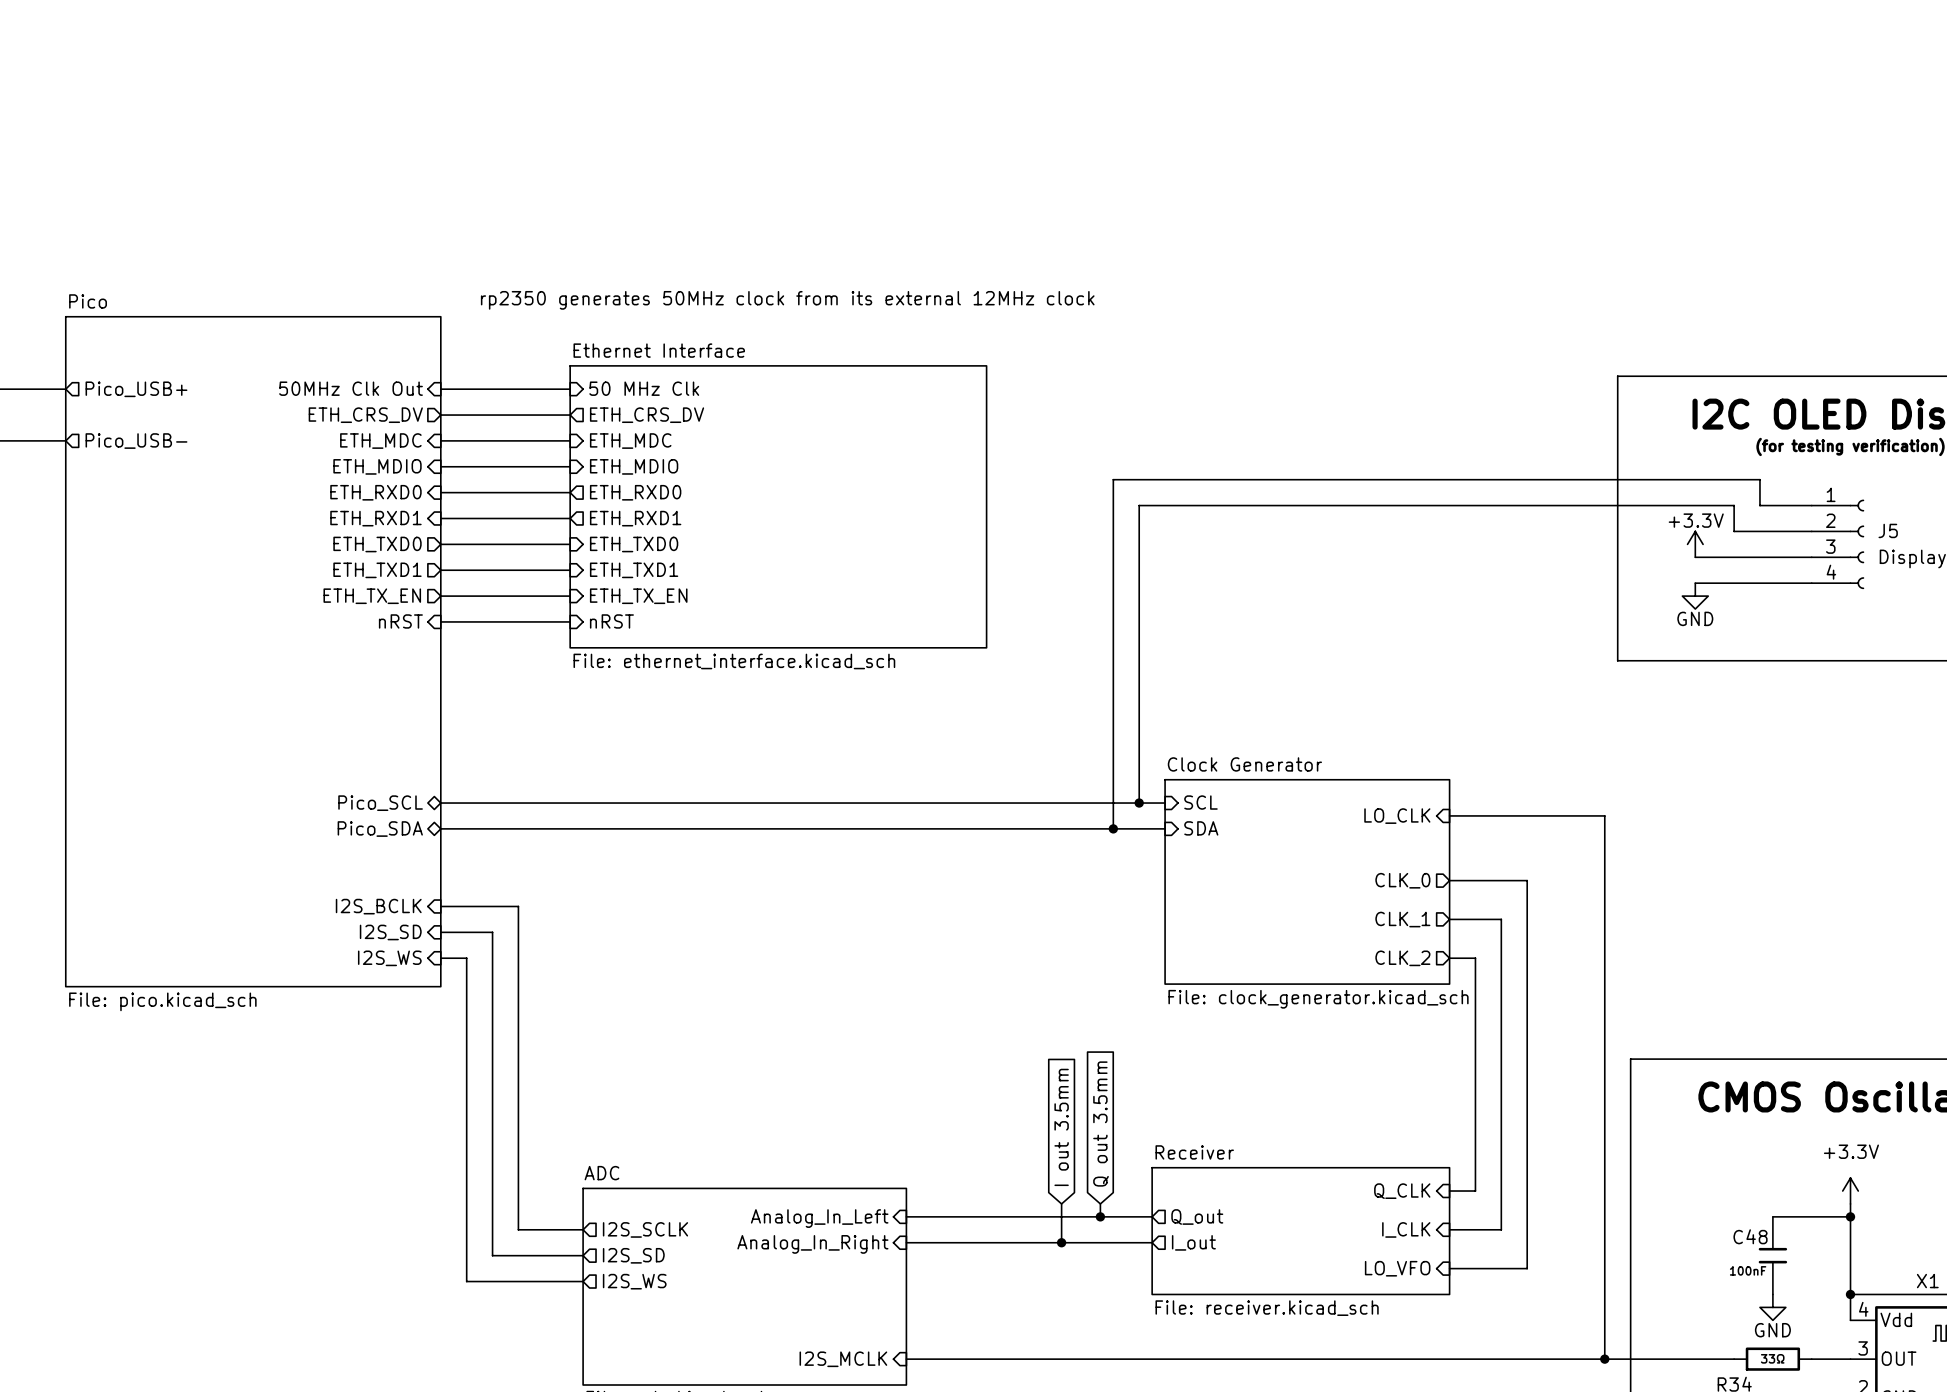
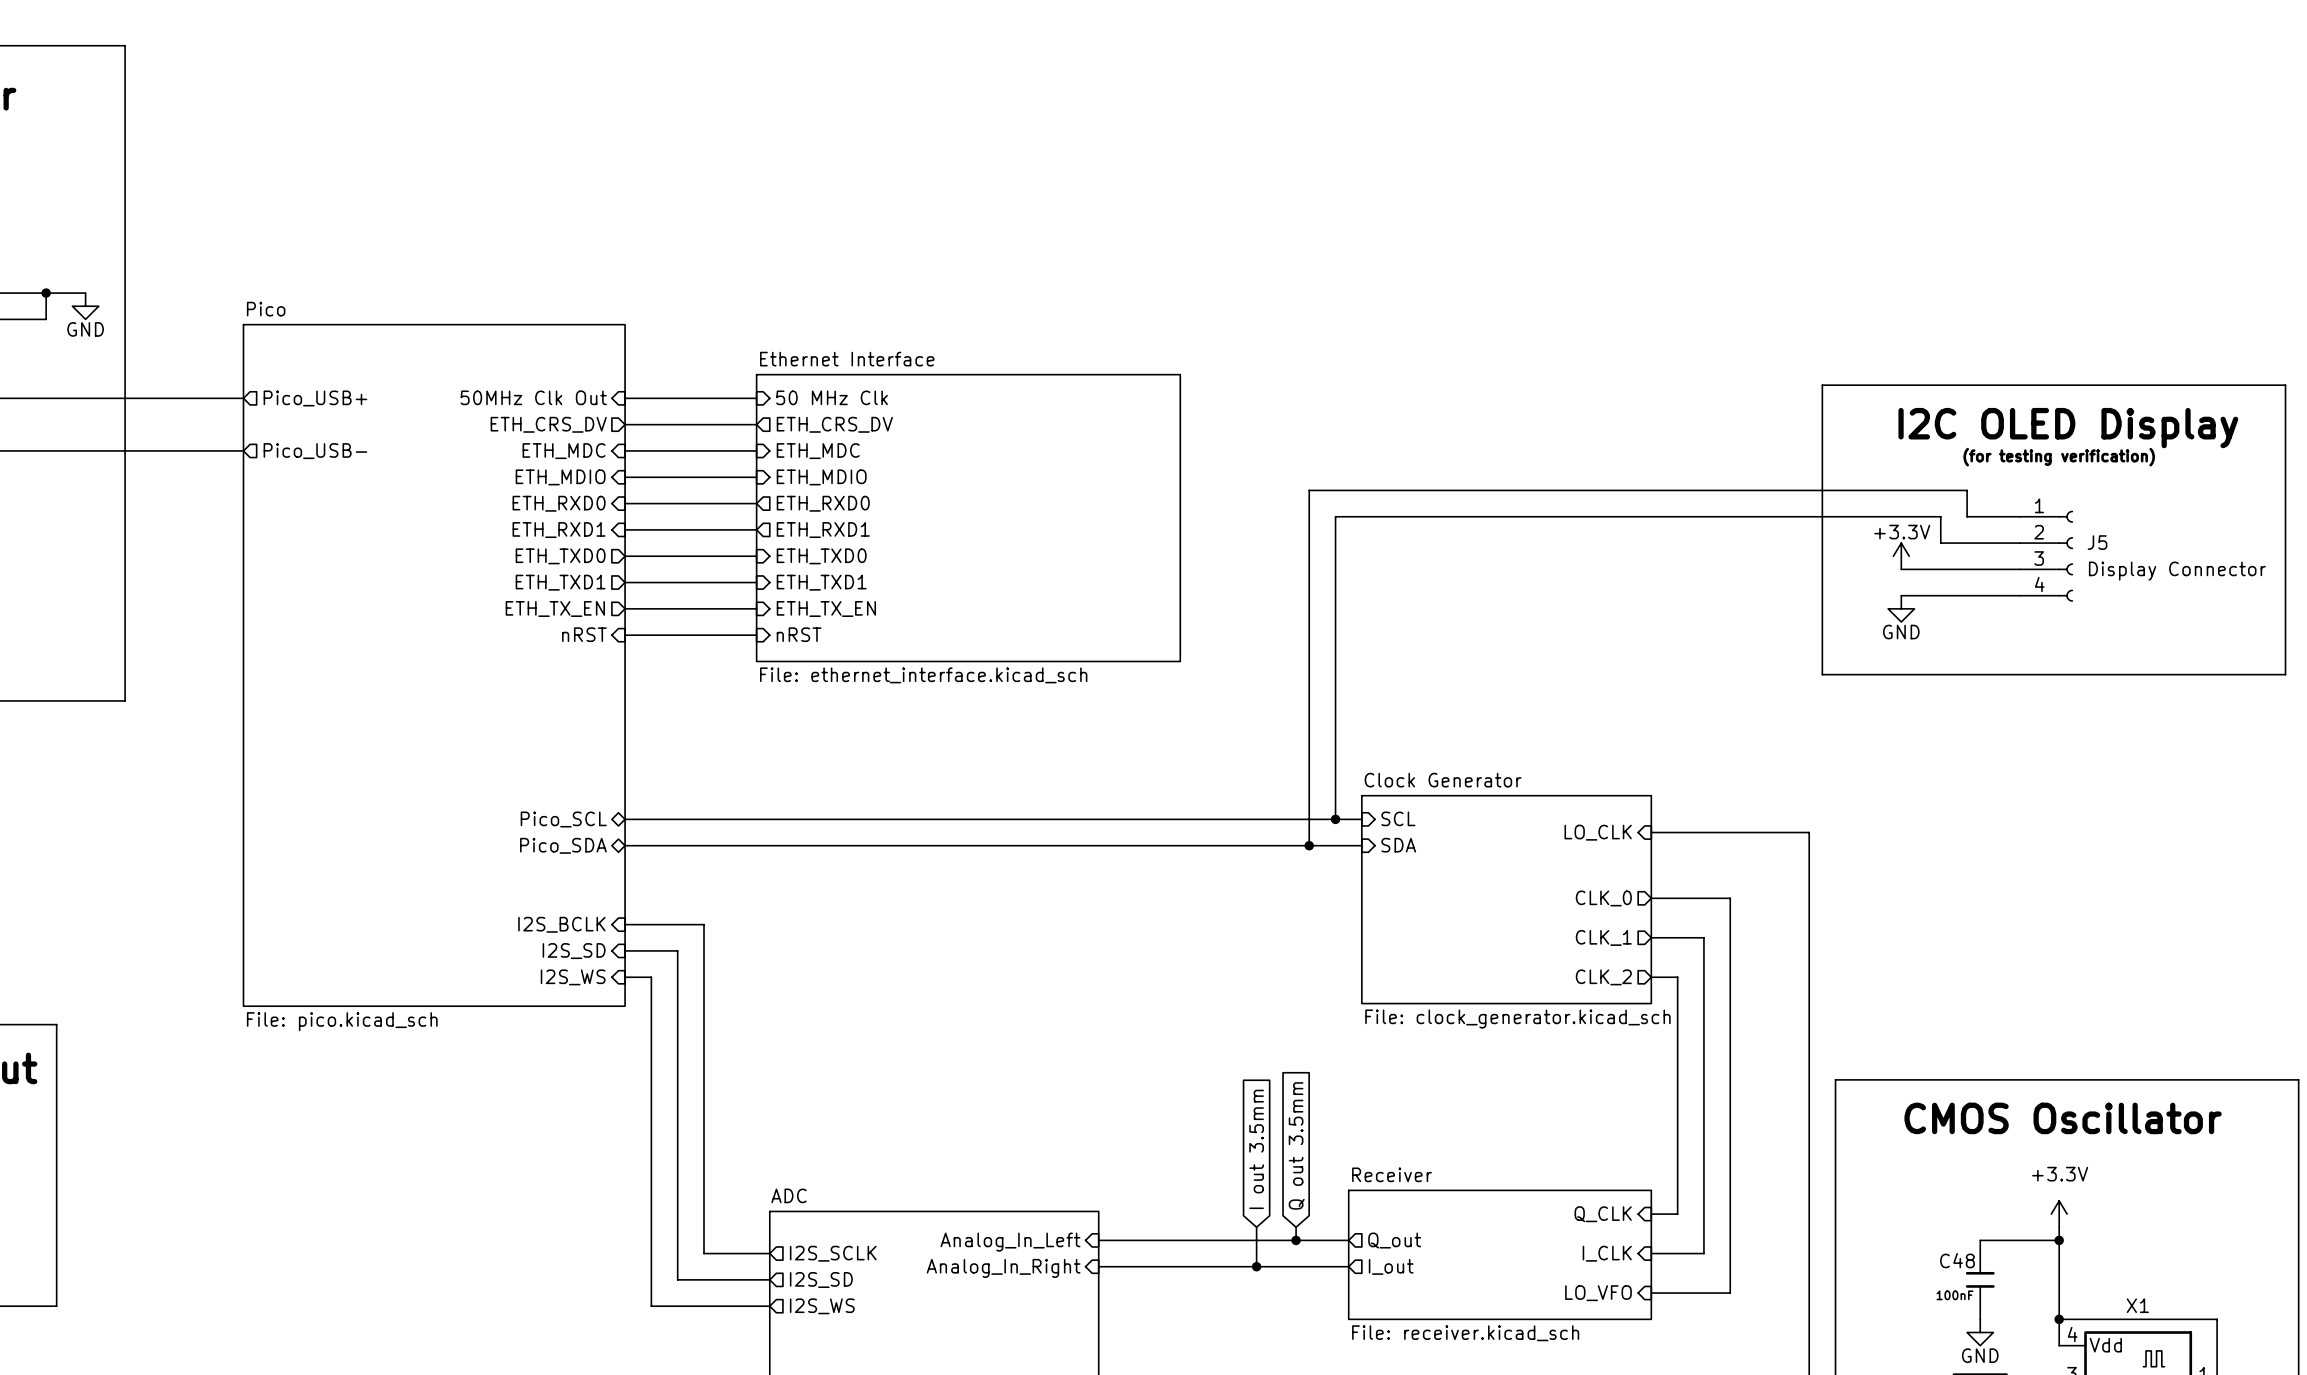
text: rp2350 generates 50MHz clock from its external 12MHz clock (787, 300) -> none

